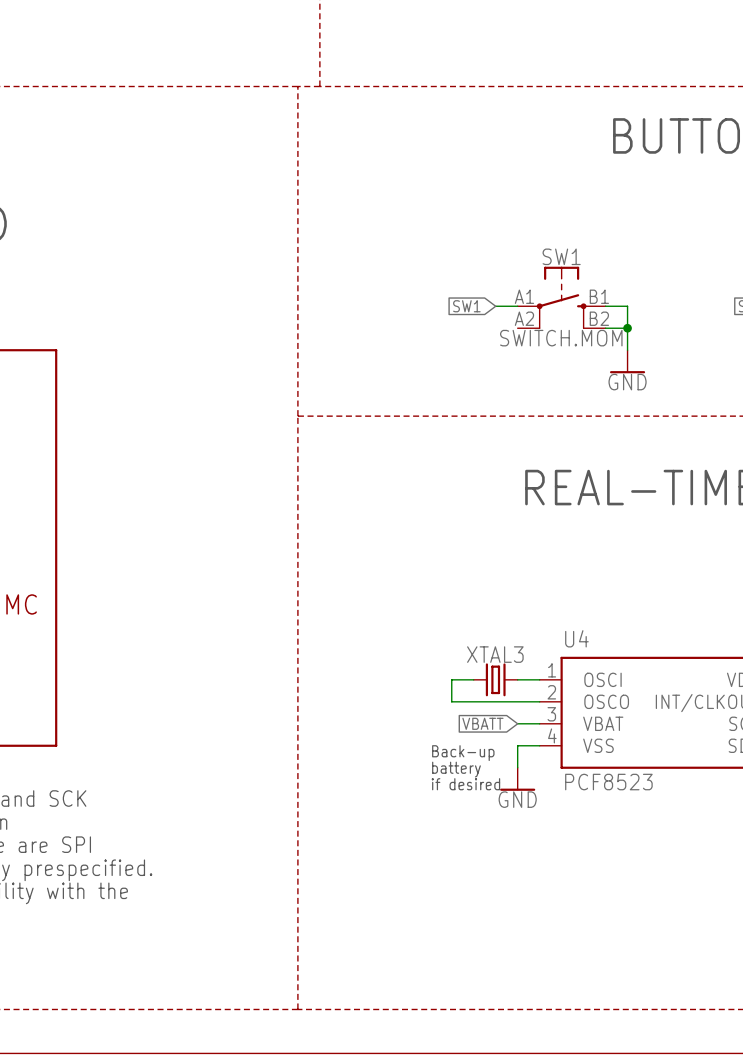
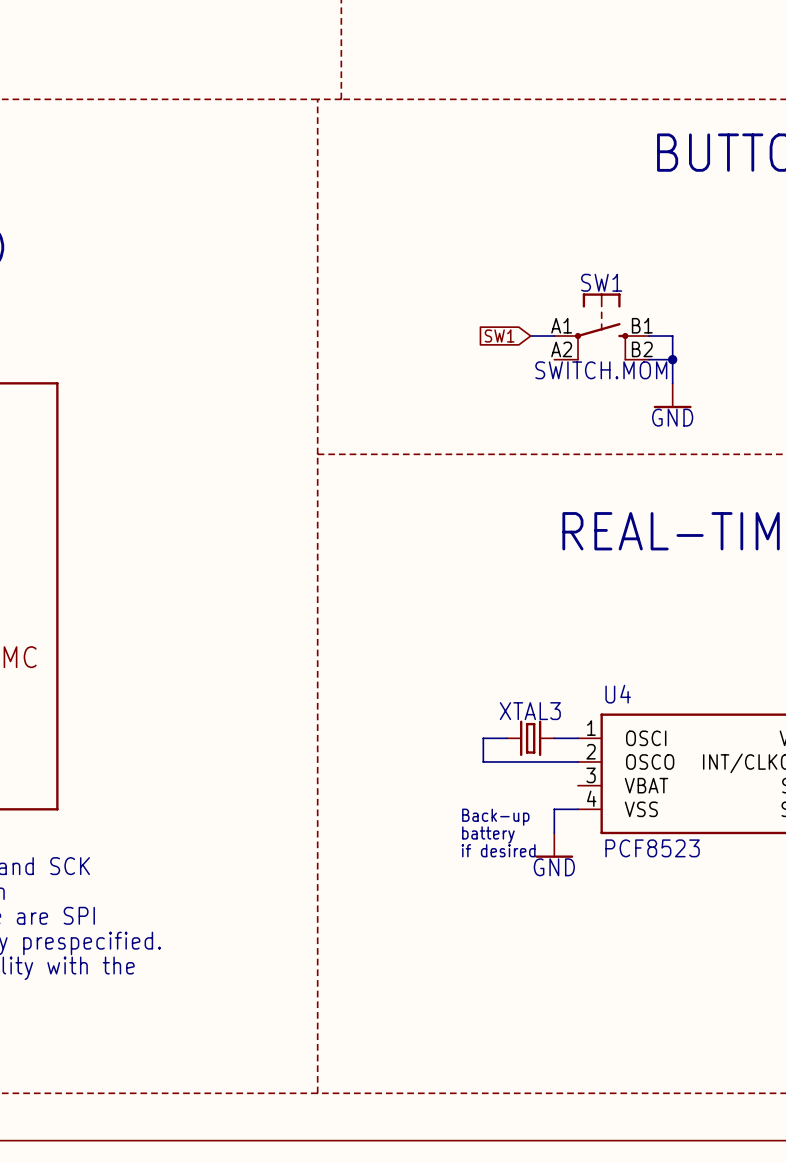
global label: VBATT (482, 723) -> none
wire: (517, 723) (539, 723) -> none

